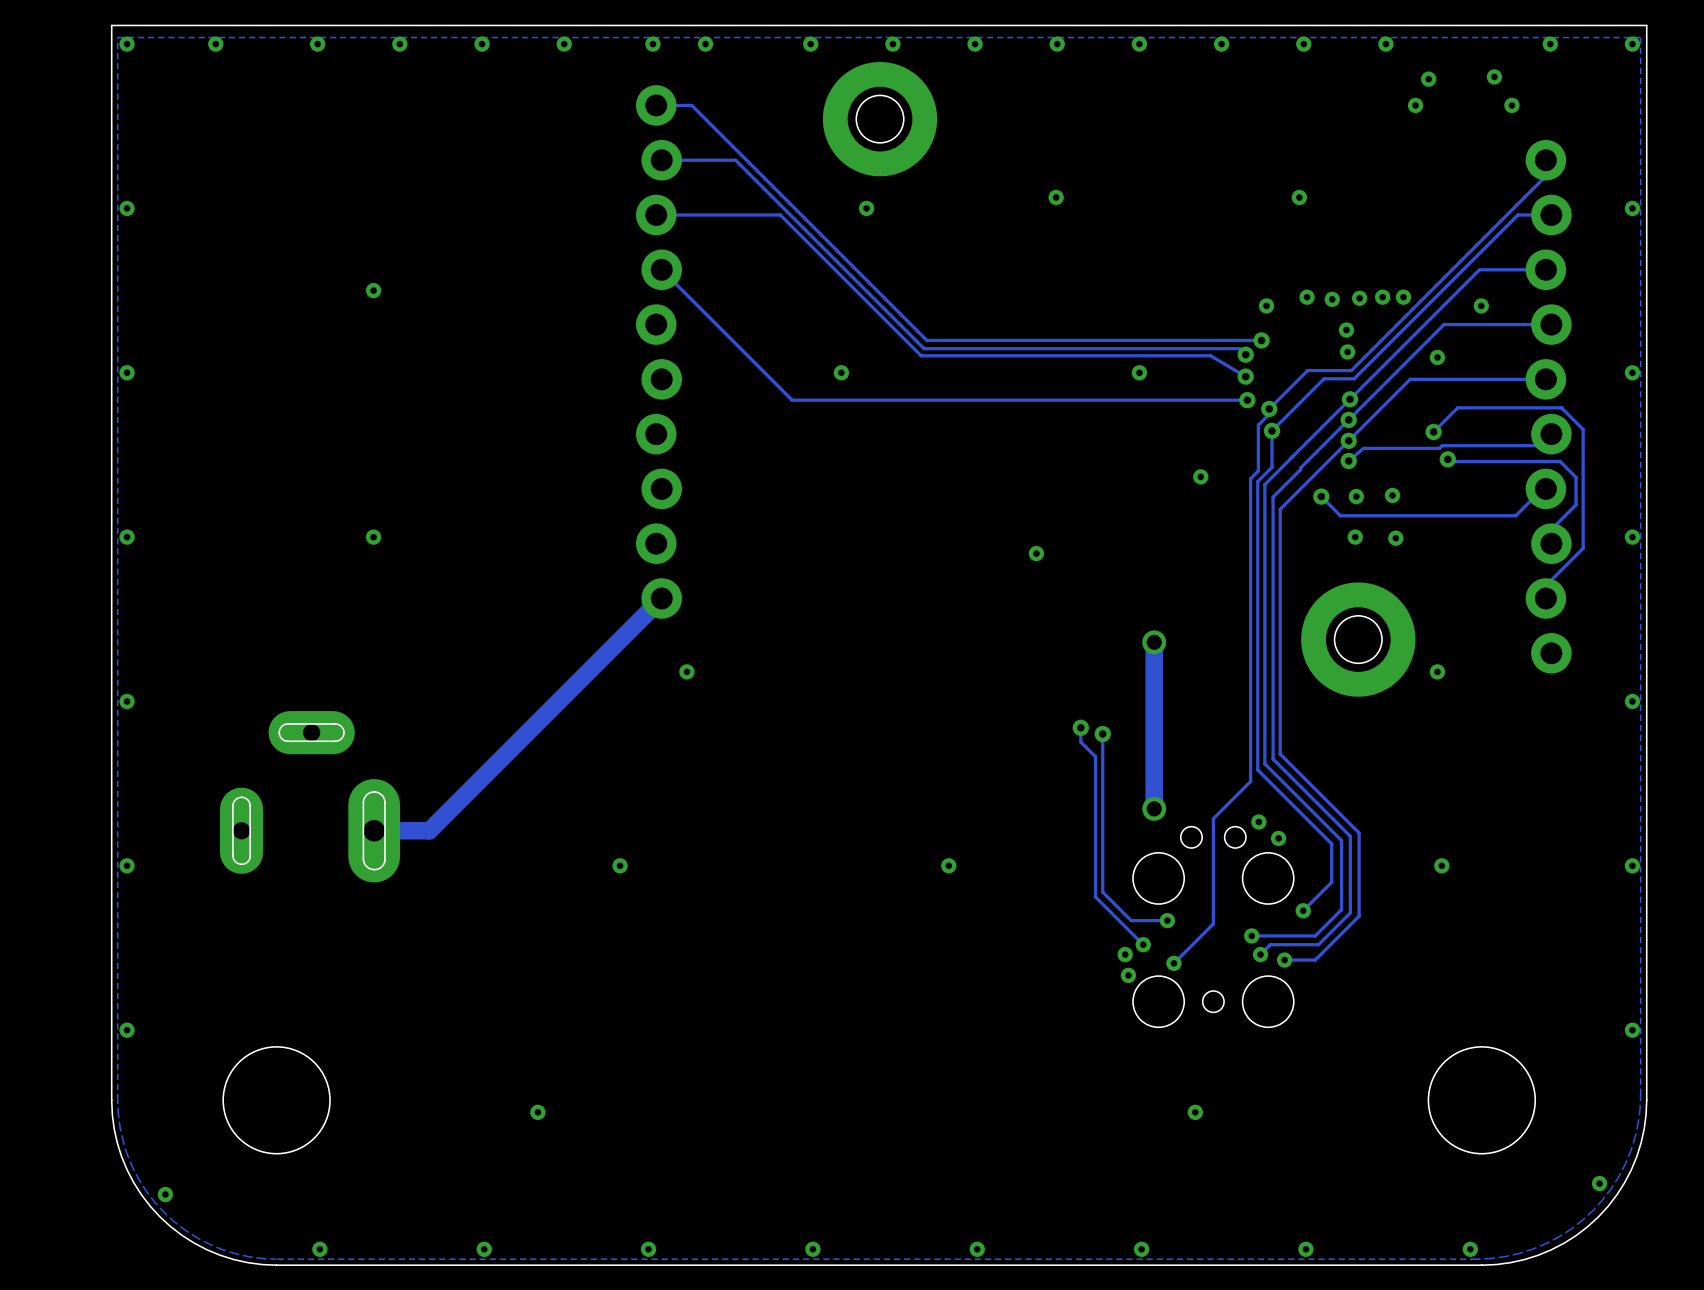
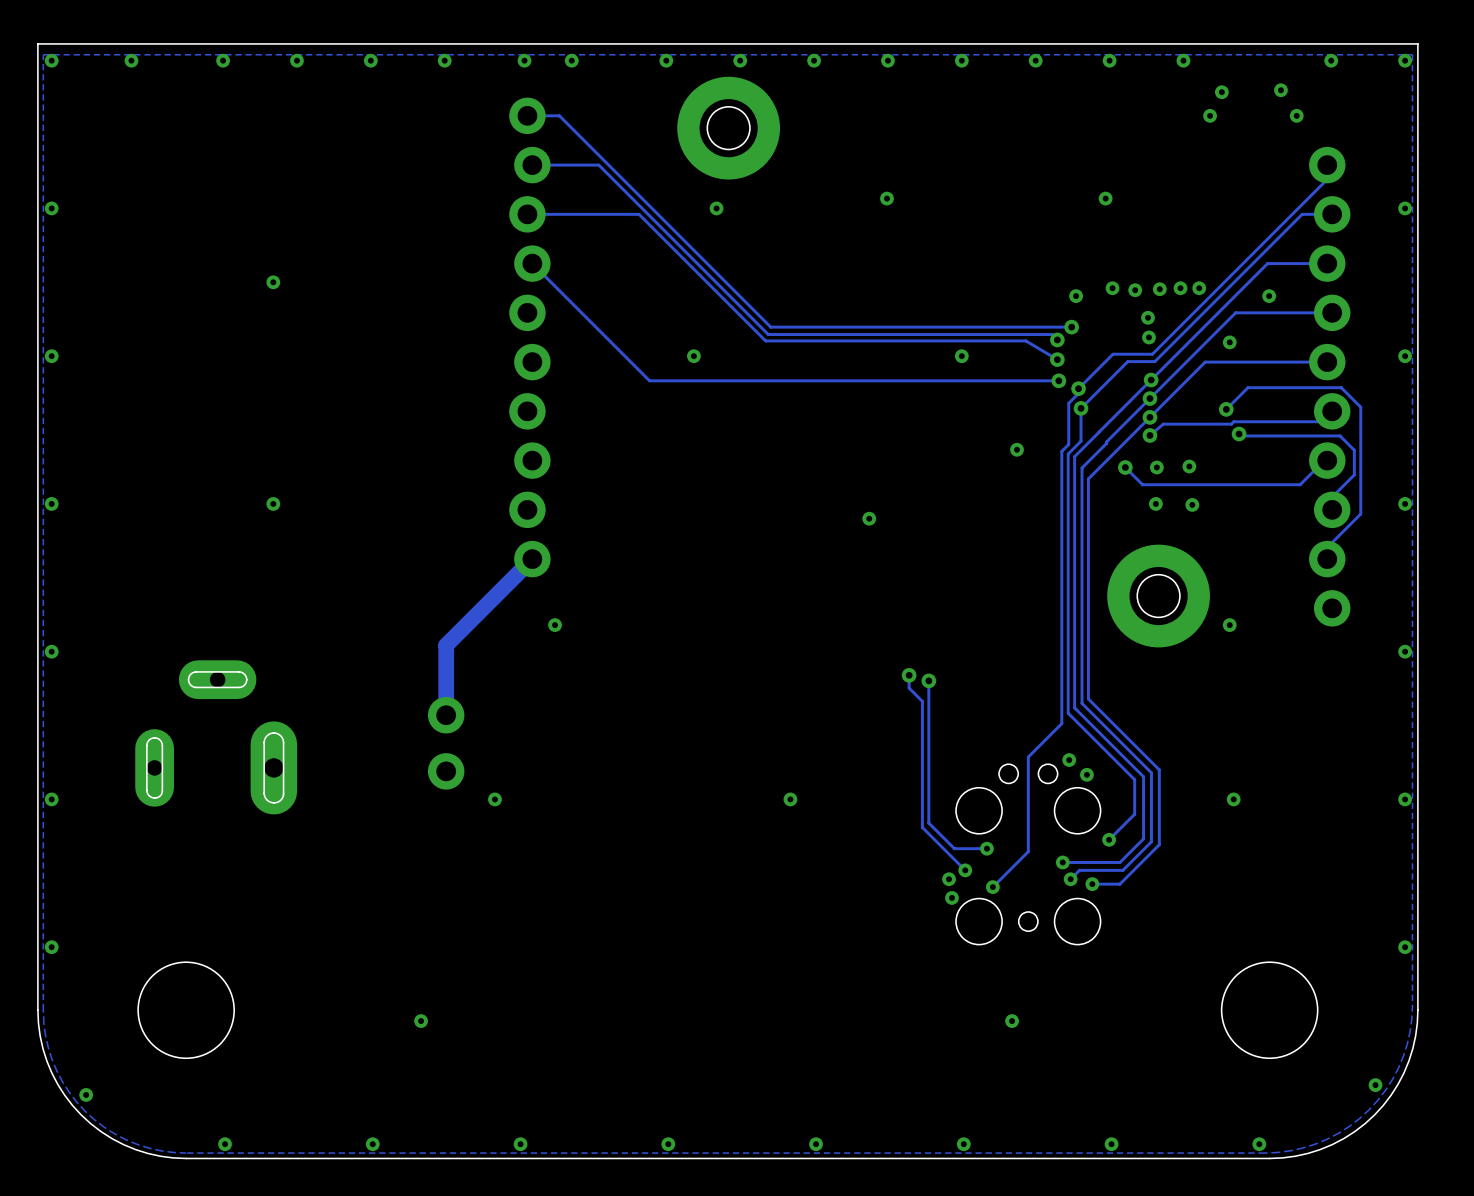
track: (1154, 642) (1154, 808) -> none
via: (1154, 642) -> none
track: (565, 694) (429, 830) (374, 830) -> (446, 645) (446, 715)
part: none -> (446, 743)
via: (1154, 808) -> none

